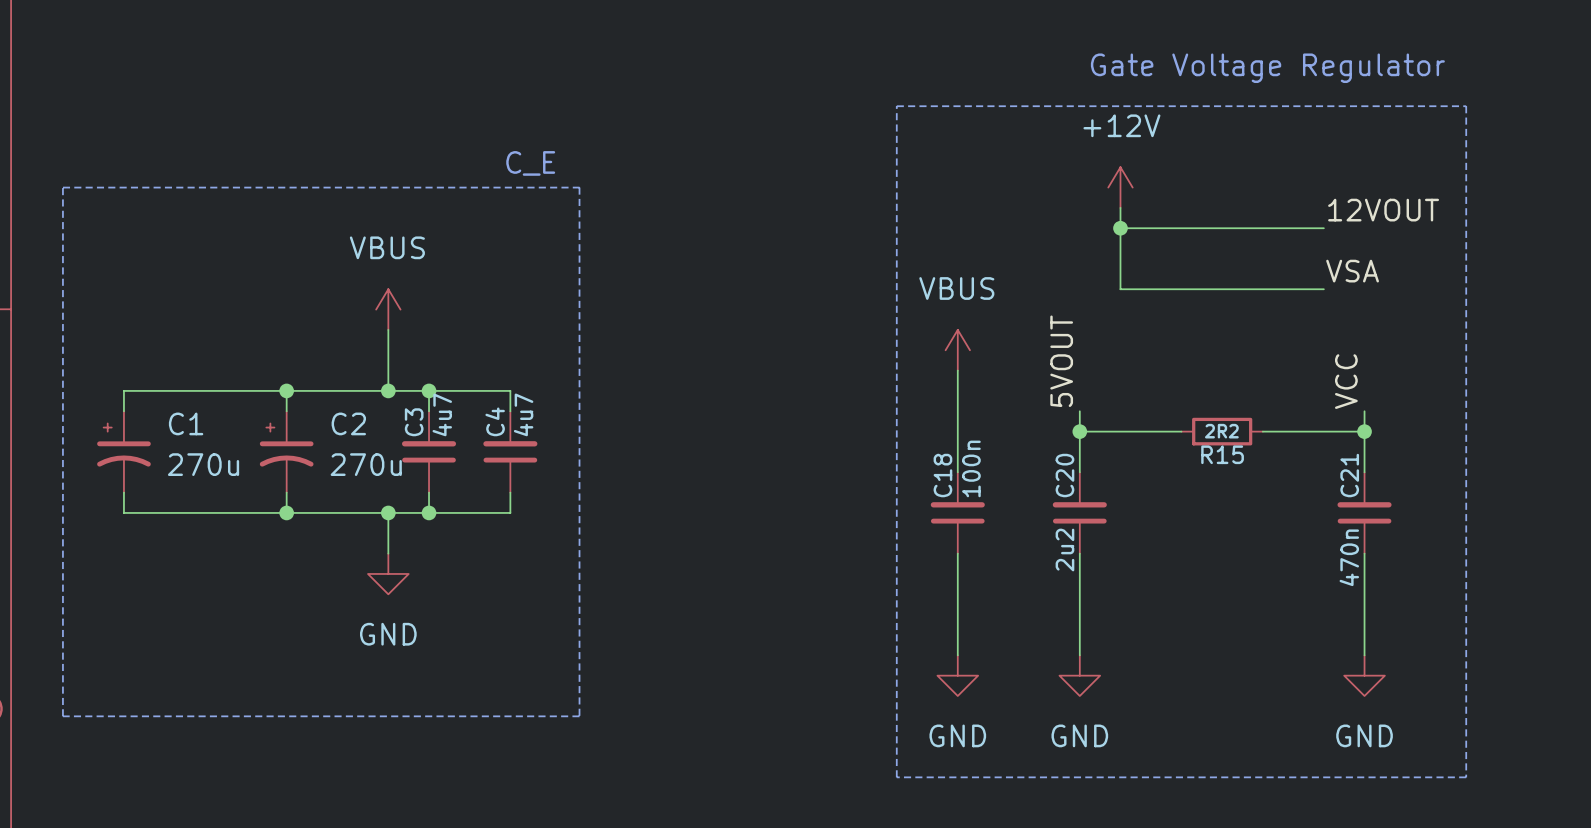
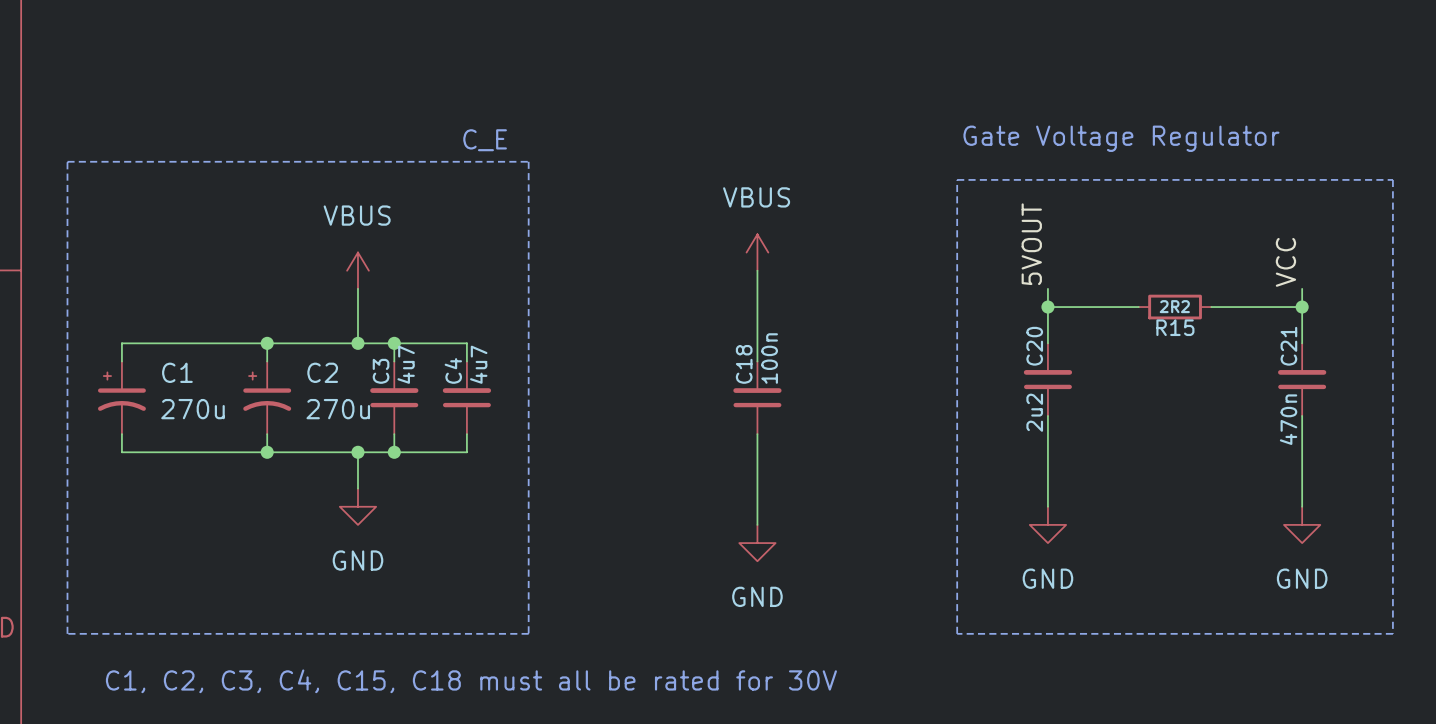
text position: Gate Voltage Regulator (1267, 68) -> Gate Voltage Regulator (1121, 138)
line: (896, 106) (1466, 106) (1466, 777) (896, 777) (896, 106) -> none
power symbol: +12V (1120, 187) -> none
line: none -> (957, 179) (1392, 179) (1392, 633) (957, 633) (957, 179)
wire: (1120, 207) (1120, 289) (1323, 289) -> none
label: 12VOUT (1383, 210) -> none
wire: (1120, 228) (1323, 228) -> none
junction: (1120, 228) -> none
label: VSA (1352, 271) -> none
power symbol position: VBUS (957, 350) -> VBUS (757, 252)
junction: none -> (1047, 307)
junction: none -> (1302, 307)
label position: 5VOUT (1061, 361) -> 5VOUT (1031, 244)
wire: (957, 370) (957, 472) -> (757, 270) (757, 361)
label position: VCC (1346, 381) -> VCC (1285, 262)
wire: (1079, 411) (1079, 472) -> (1047, 288) (1047, 343)
wire: (1364, 411) (1364, 472) -> (1302, 288) (1302, 343)
wire: (1079, 431) (1181, 431) -> (1047, 307) (1138, 307)
junction: (1079, 431) -> none
R15 position: (1222, 431) -> (1175, 307)
wire: (1262, 431) (1364, 431) -> (1211, 307) (1302, 307)
junction: (1364, 431) -> none
C18 position: (957, 512) -> (757, 397)
C20 position: (1079, 512) -> (1047, 379)
C21 position: (1364, 512) -> (1302, 379)
wire: (957, 553) (957, 655) -> (757, 434) (757, 524)
wire: (1079, 553) (1079, 655) -> (1047, 415) (1047, 506)
wire: (1364, 553) (1364, 655) -> (1302, 415) (1302, 506)
power symbol: none -> GND (1047, 524)
power symbol: none -> GND (1302, 524)
power symbol: none -> GND (757, 543)
power symbol: GND (957, 675) -> none
power symbol: GND (1079, 675) -> none
power symbol: GND (1364, 675) -> none
text: none -> C1, C2, C3, C4, C15, C18 must all be rated for 30V (471, 681)

